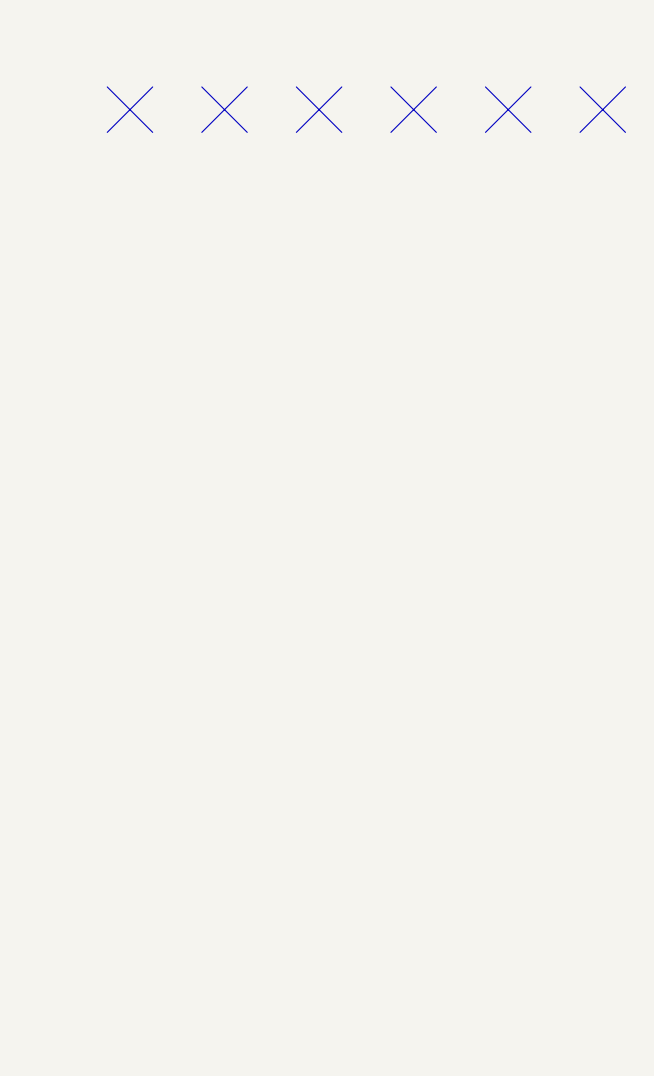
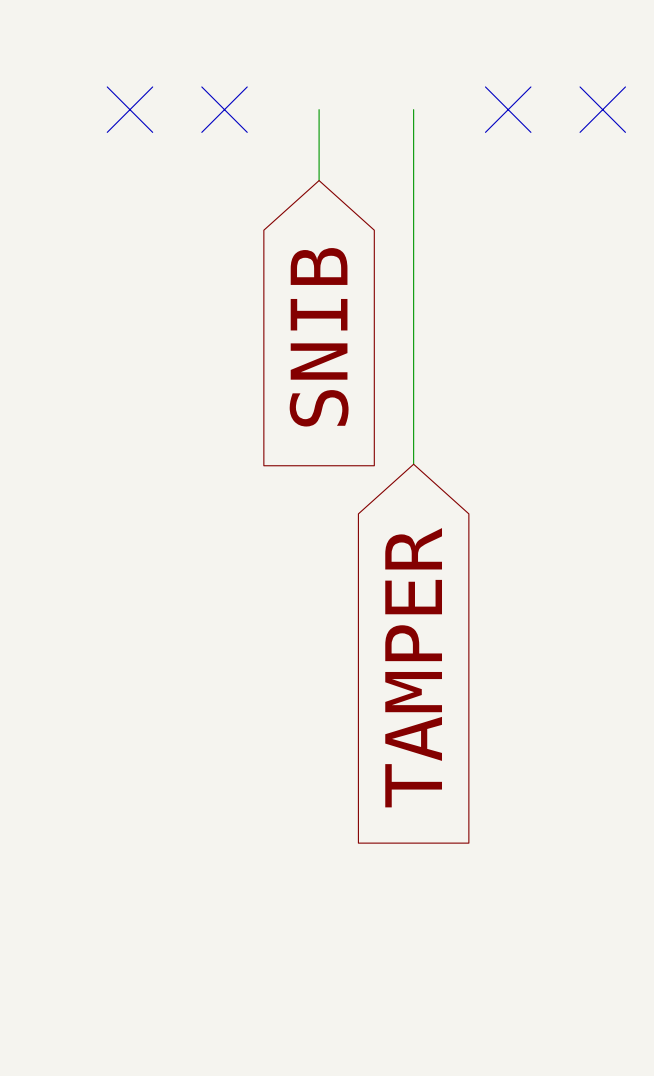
wire: none -> (319, 109) (319, 180)
no-connect mark: (319, 109) -> none
wire: none -> (413, 109) (413, 464)
no-connect mark: (413, 109) -> none
global label: none -> SNIB (319, 337)
global label: none -> TAMPER (413, 667)

